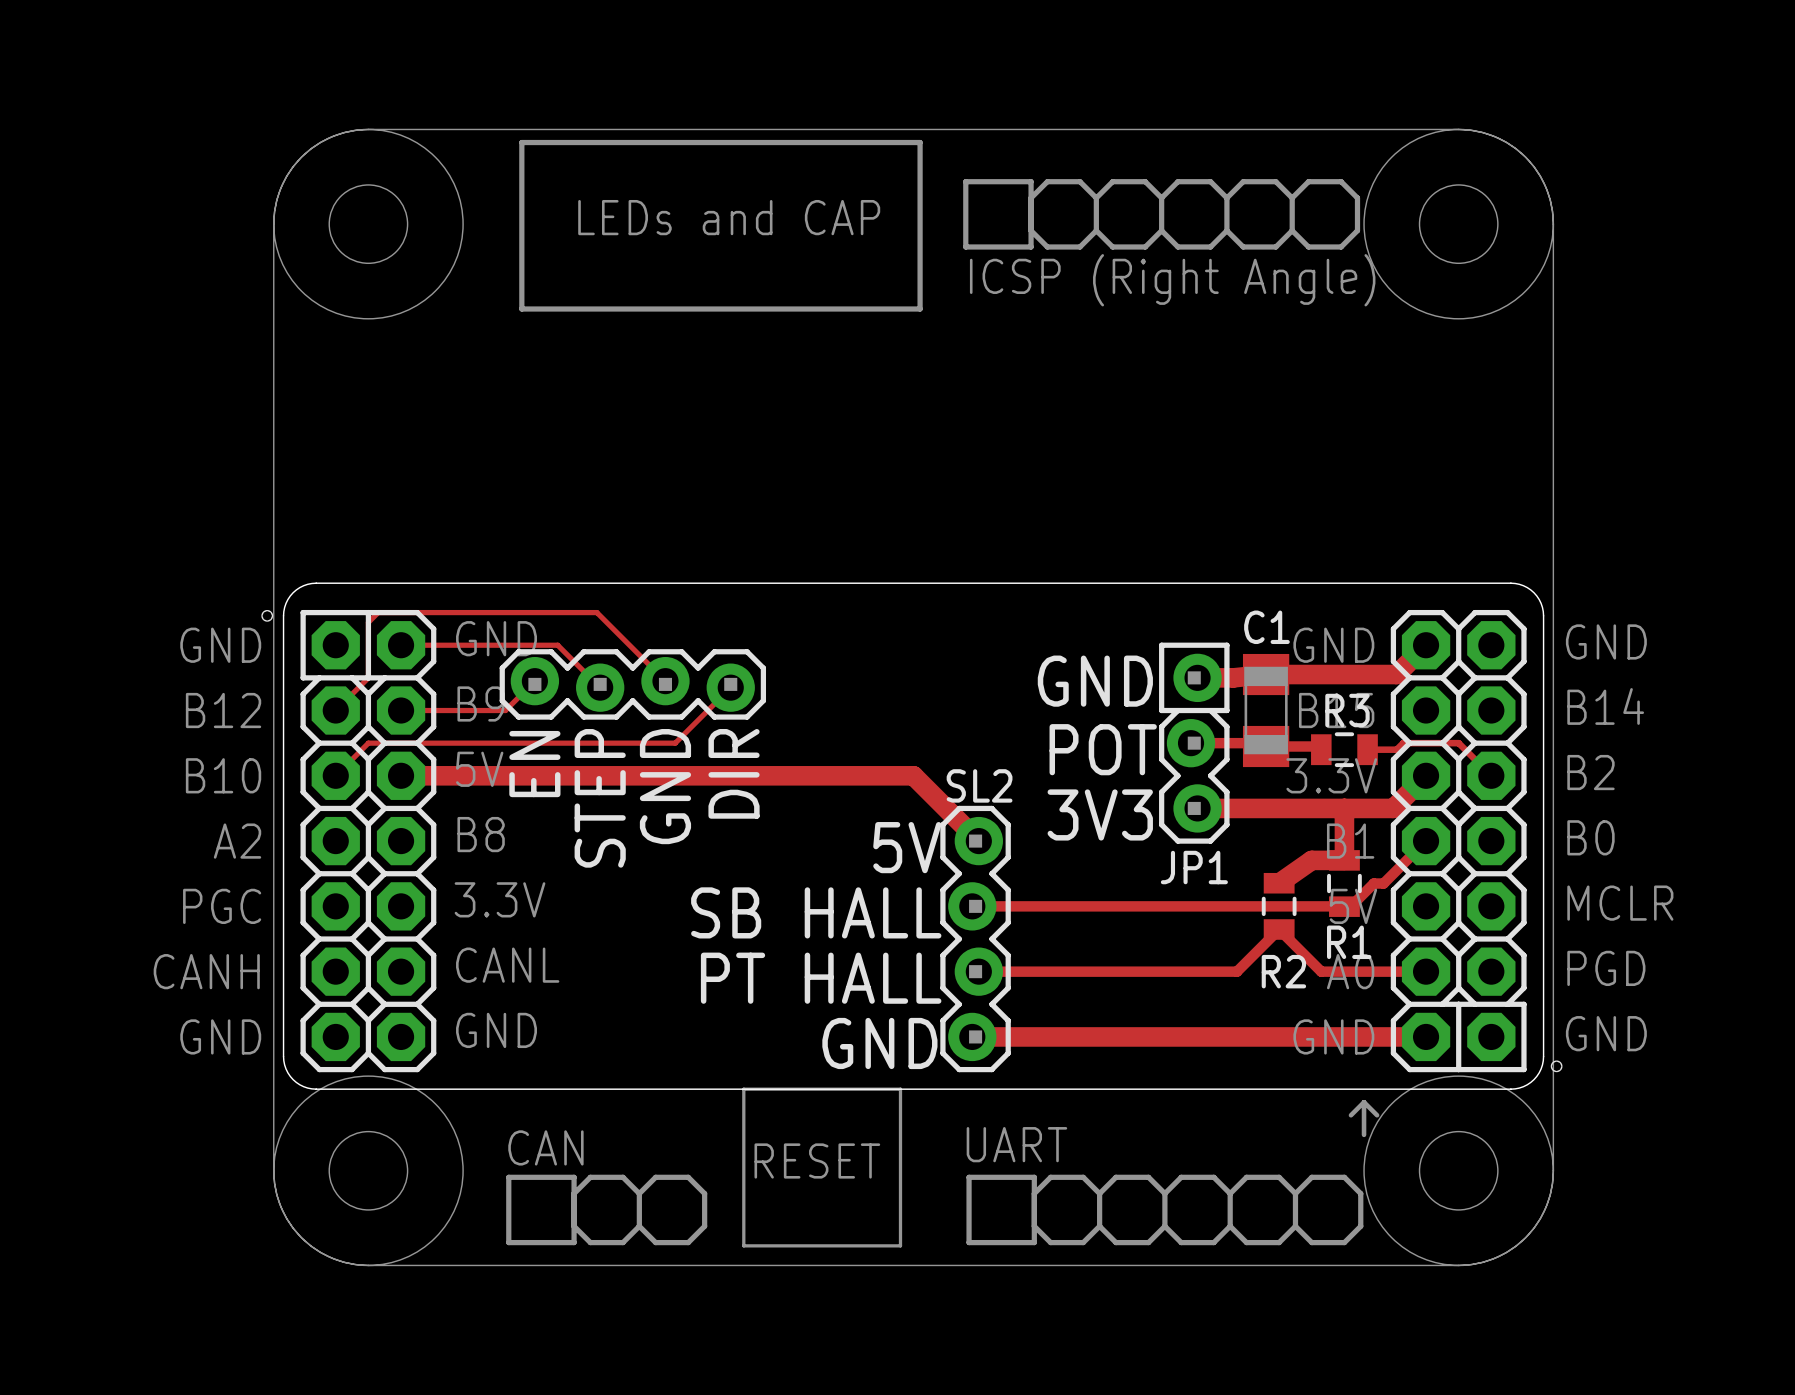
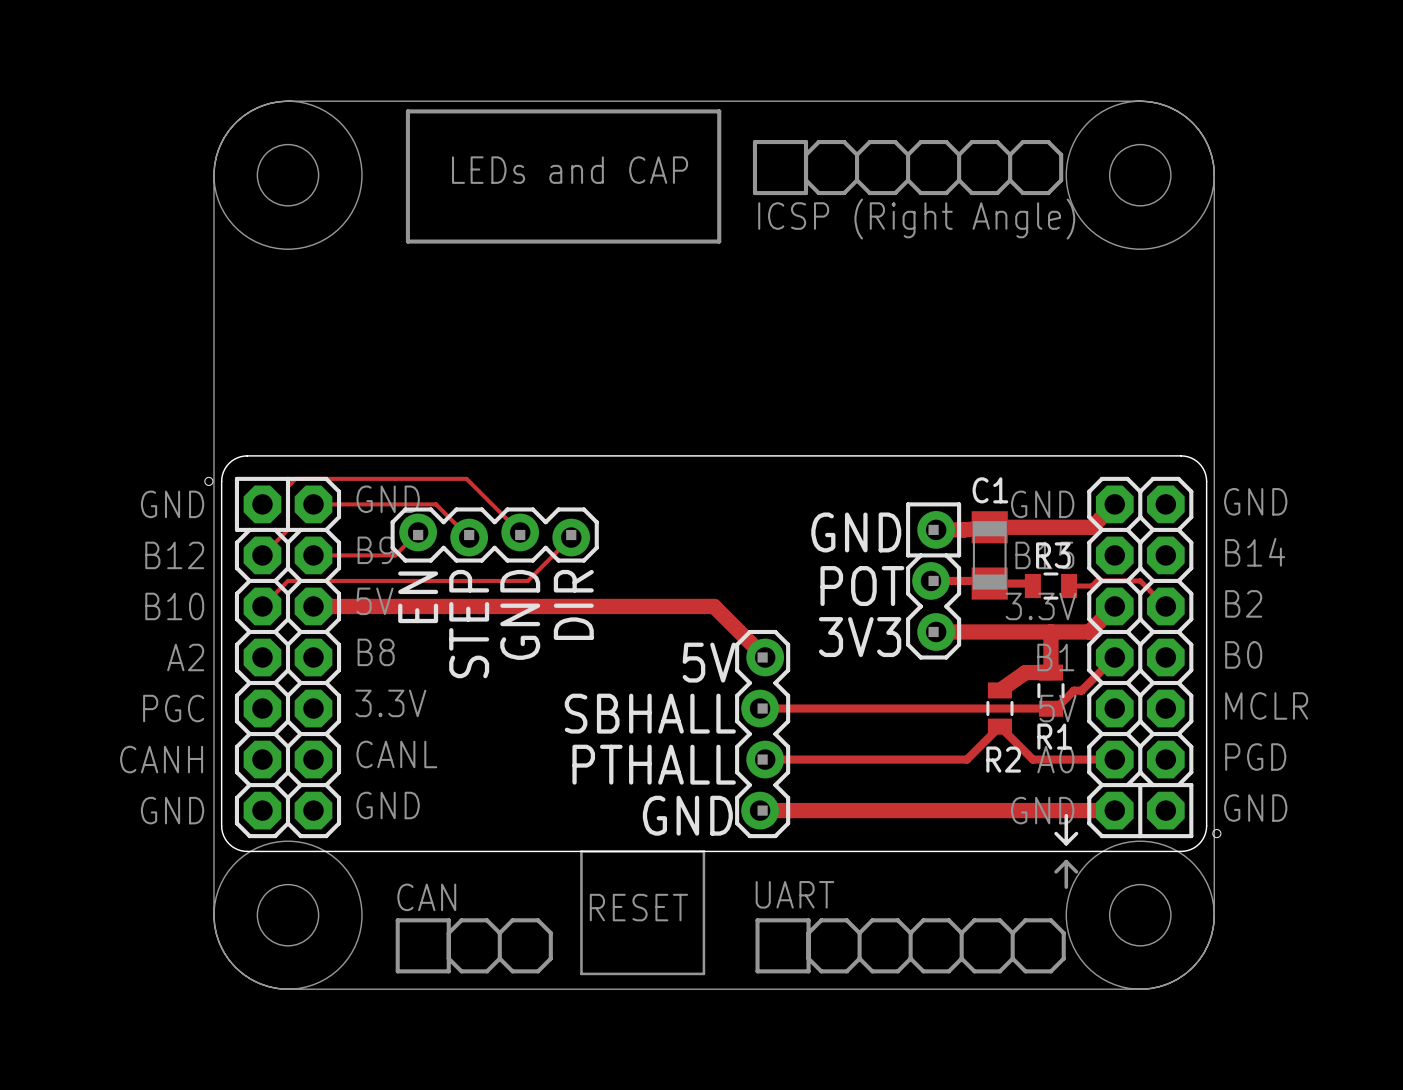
SL2 name: SL2 (979, 785) -> none
JP1 name: JP1 (1194, 867) -> none
text: SB HALL (816, 912) -> SBHALL (650, 713)
text: PT HALL (821, 978) -> PTHALL (654, 764)
line: none -> (1066, 815) (1066, 841)
line: none -> (1056, 833) (1066, 843) (1076, 833)

